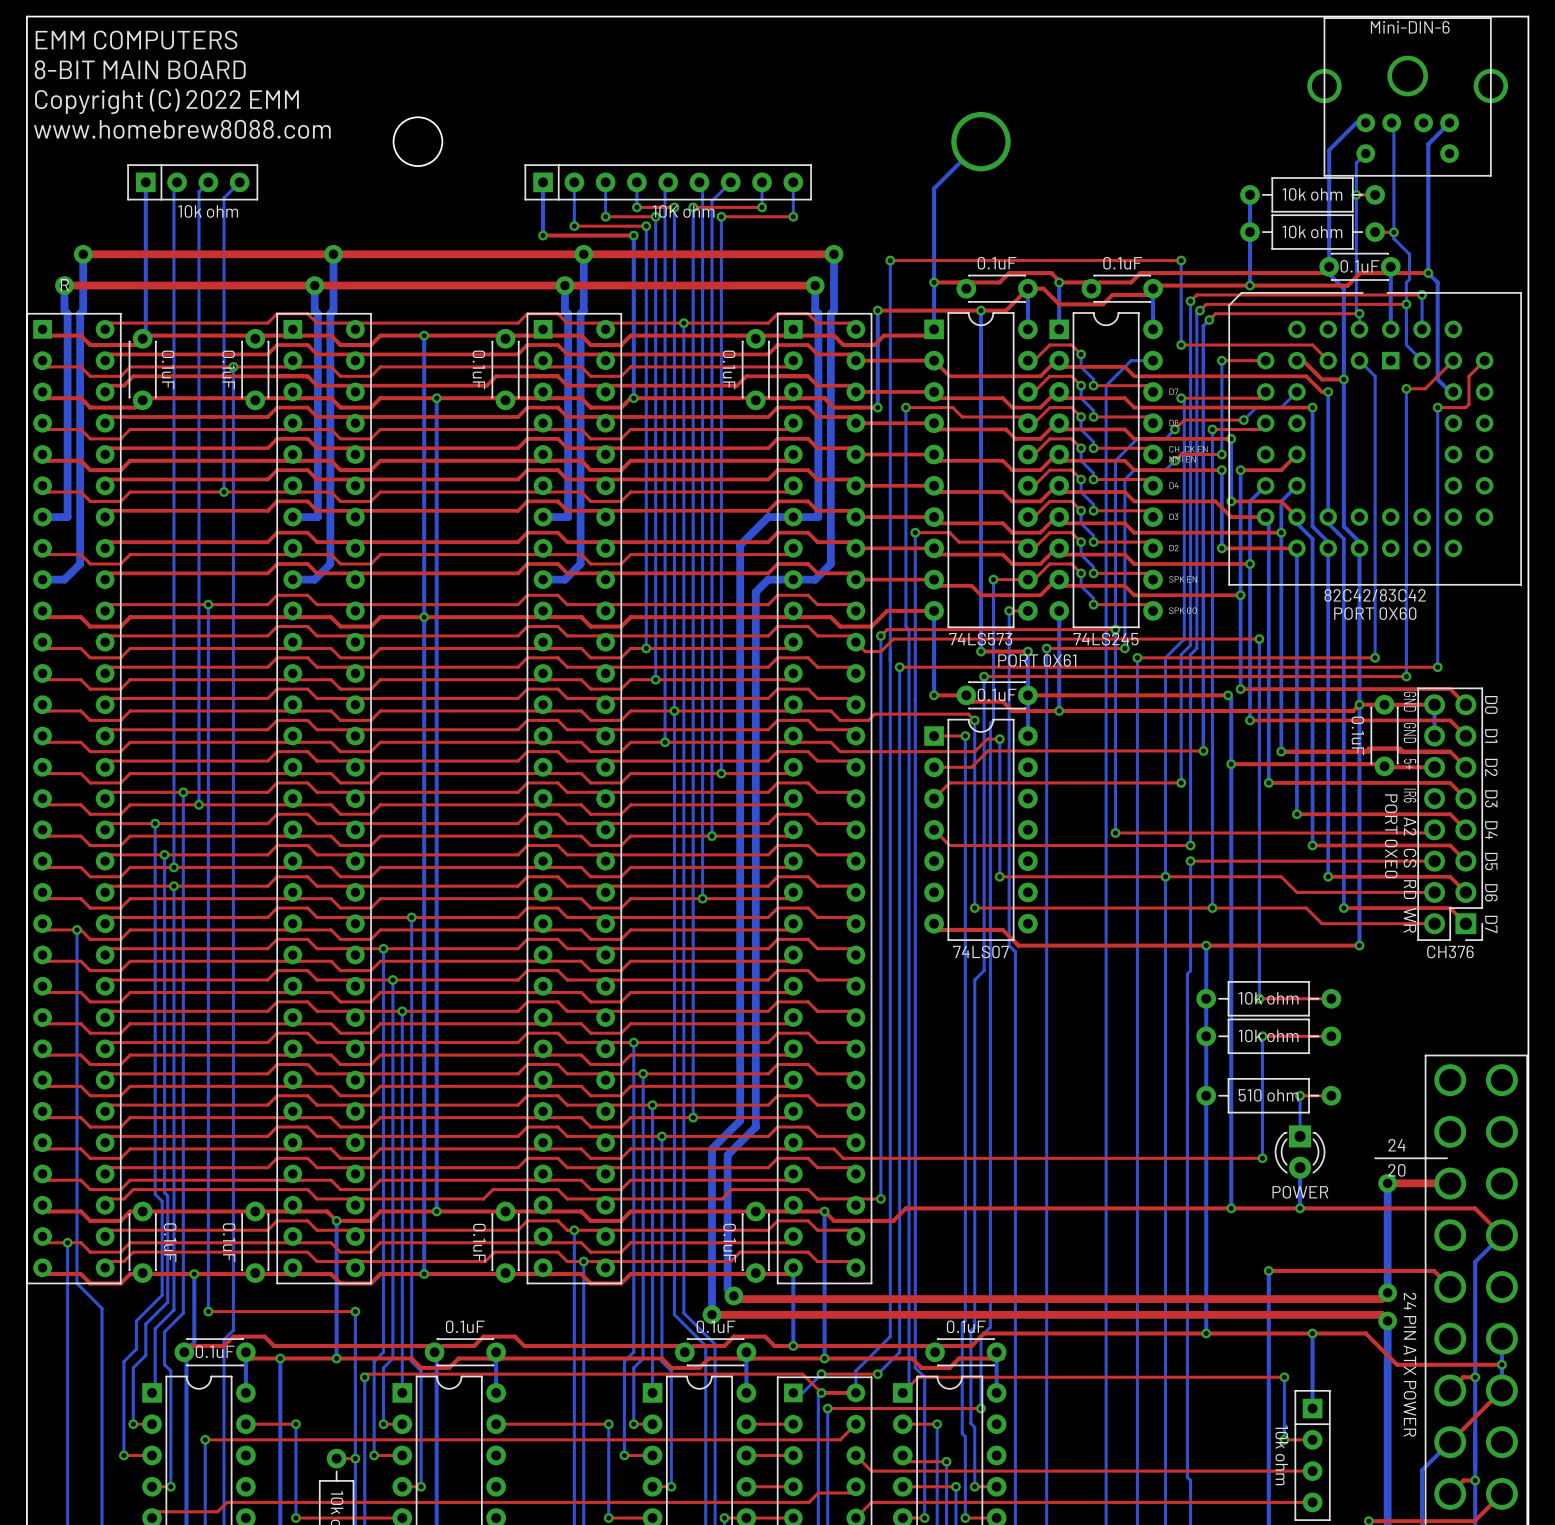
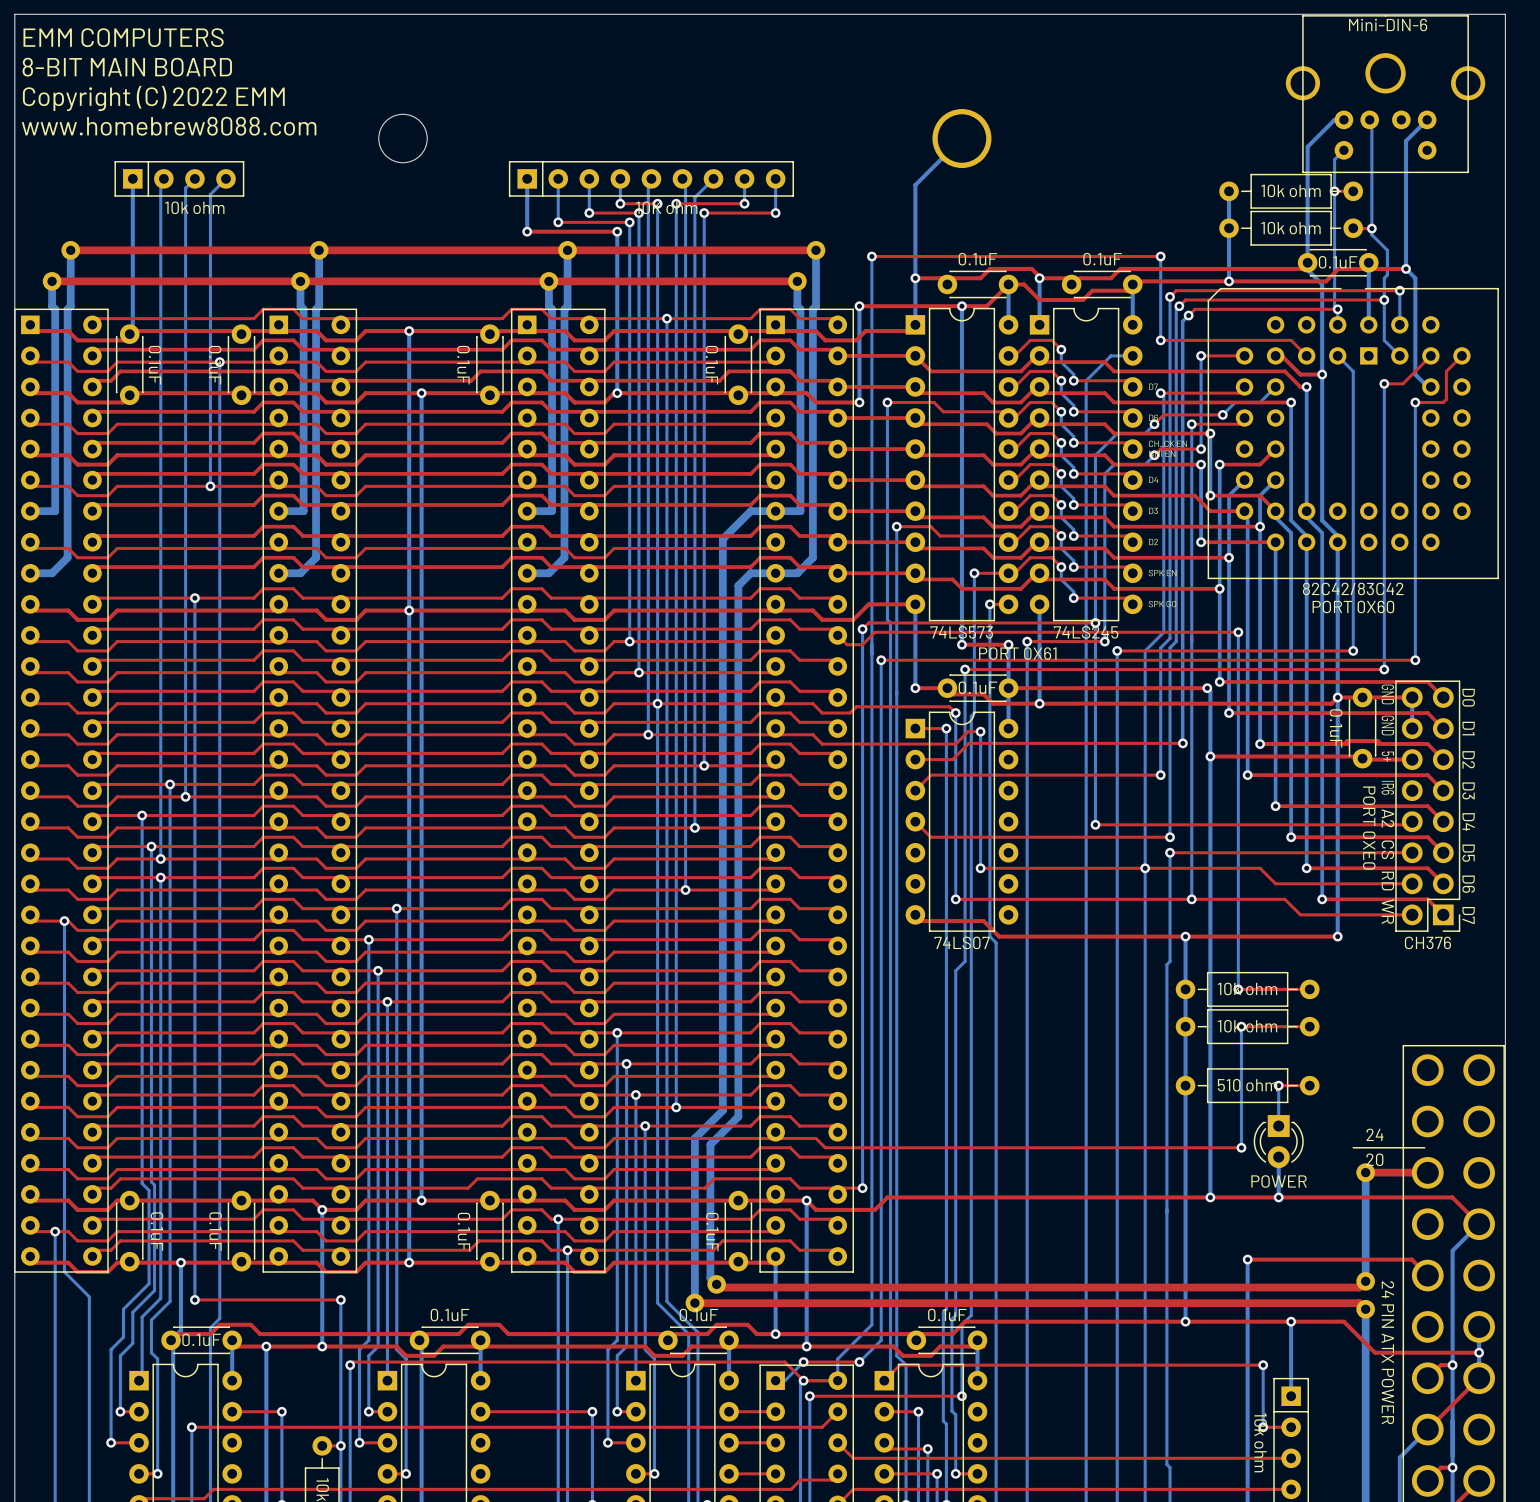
R name: R (64, 285) -> none

